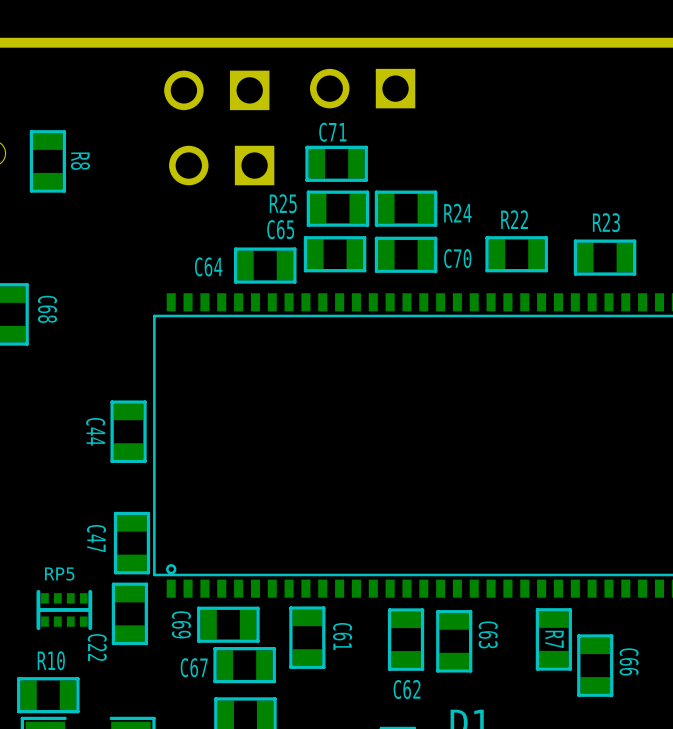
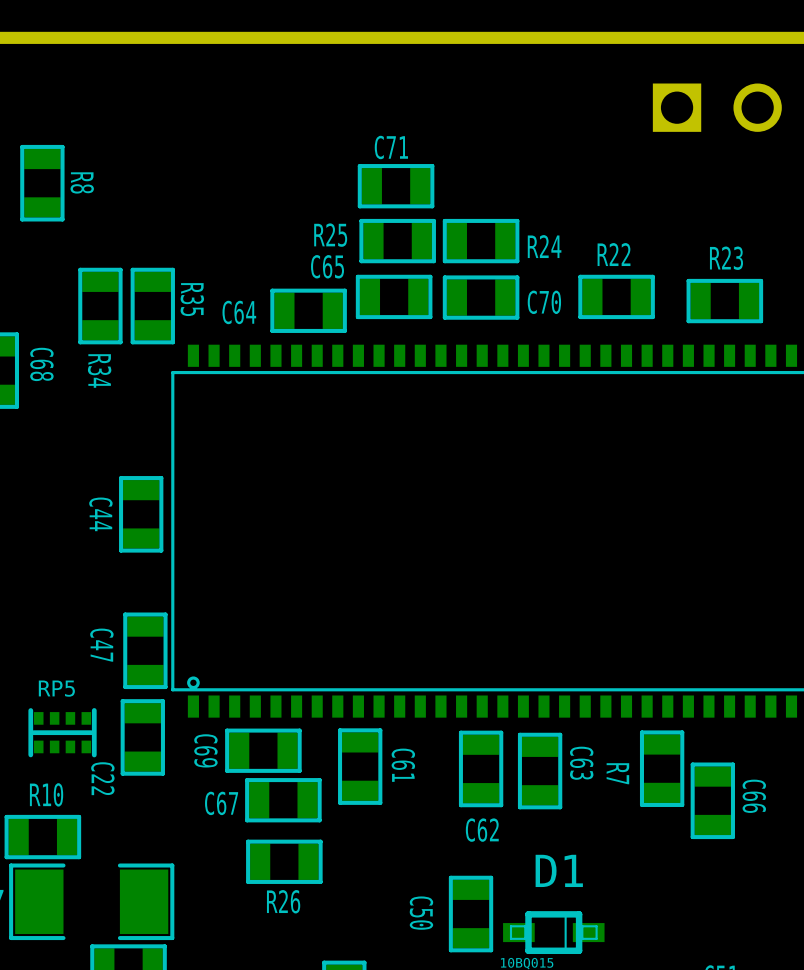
part: (362, 88) -> none
part: (216, 90) -> none
part: none -> (717, 107)
part: (221, 165) -> none
R34: none -> (100, 306)
R35: none -> (152, 306)
R7 name position: R7 (554, 639) -> R7 (617, 773)

